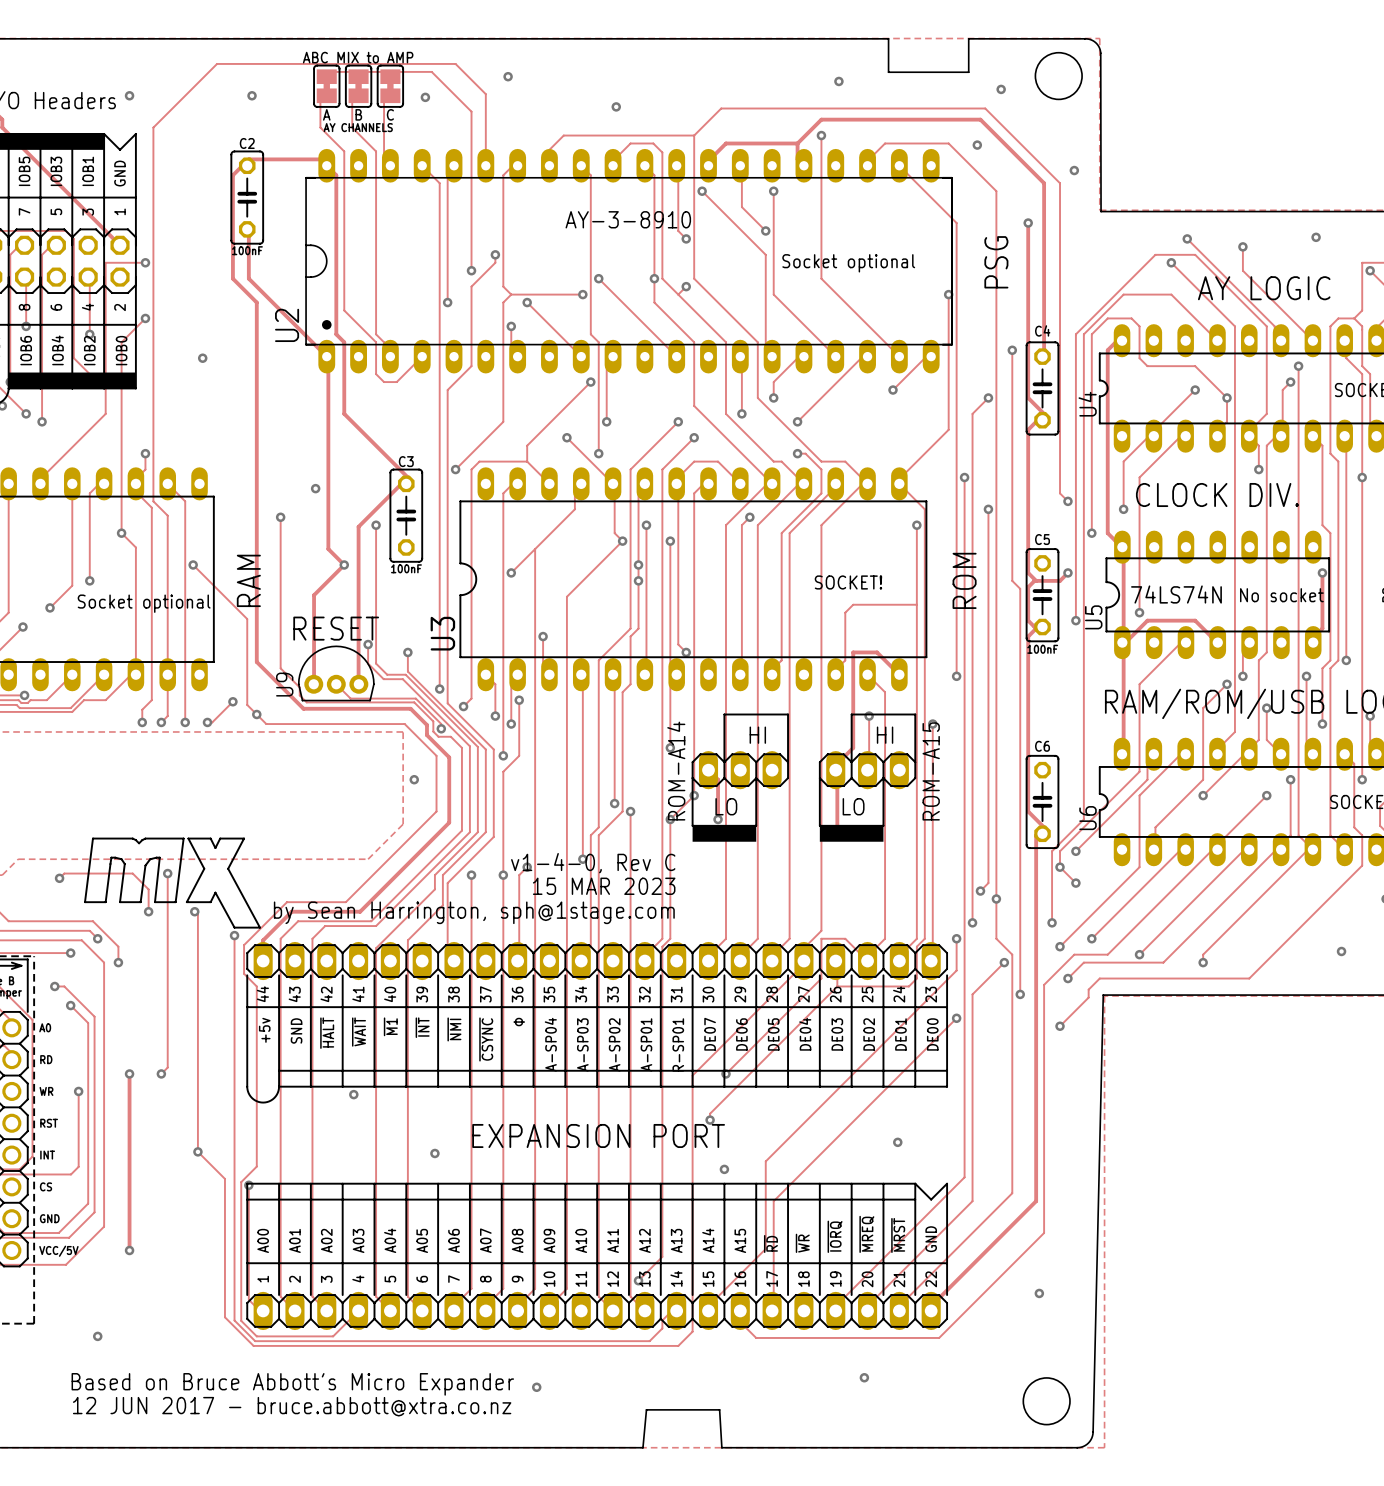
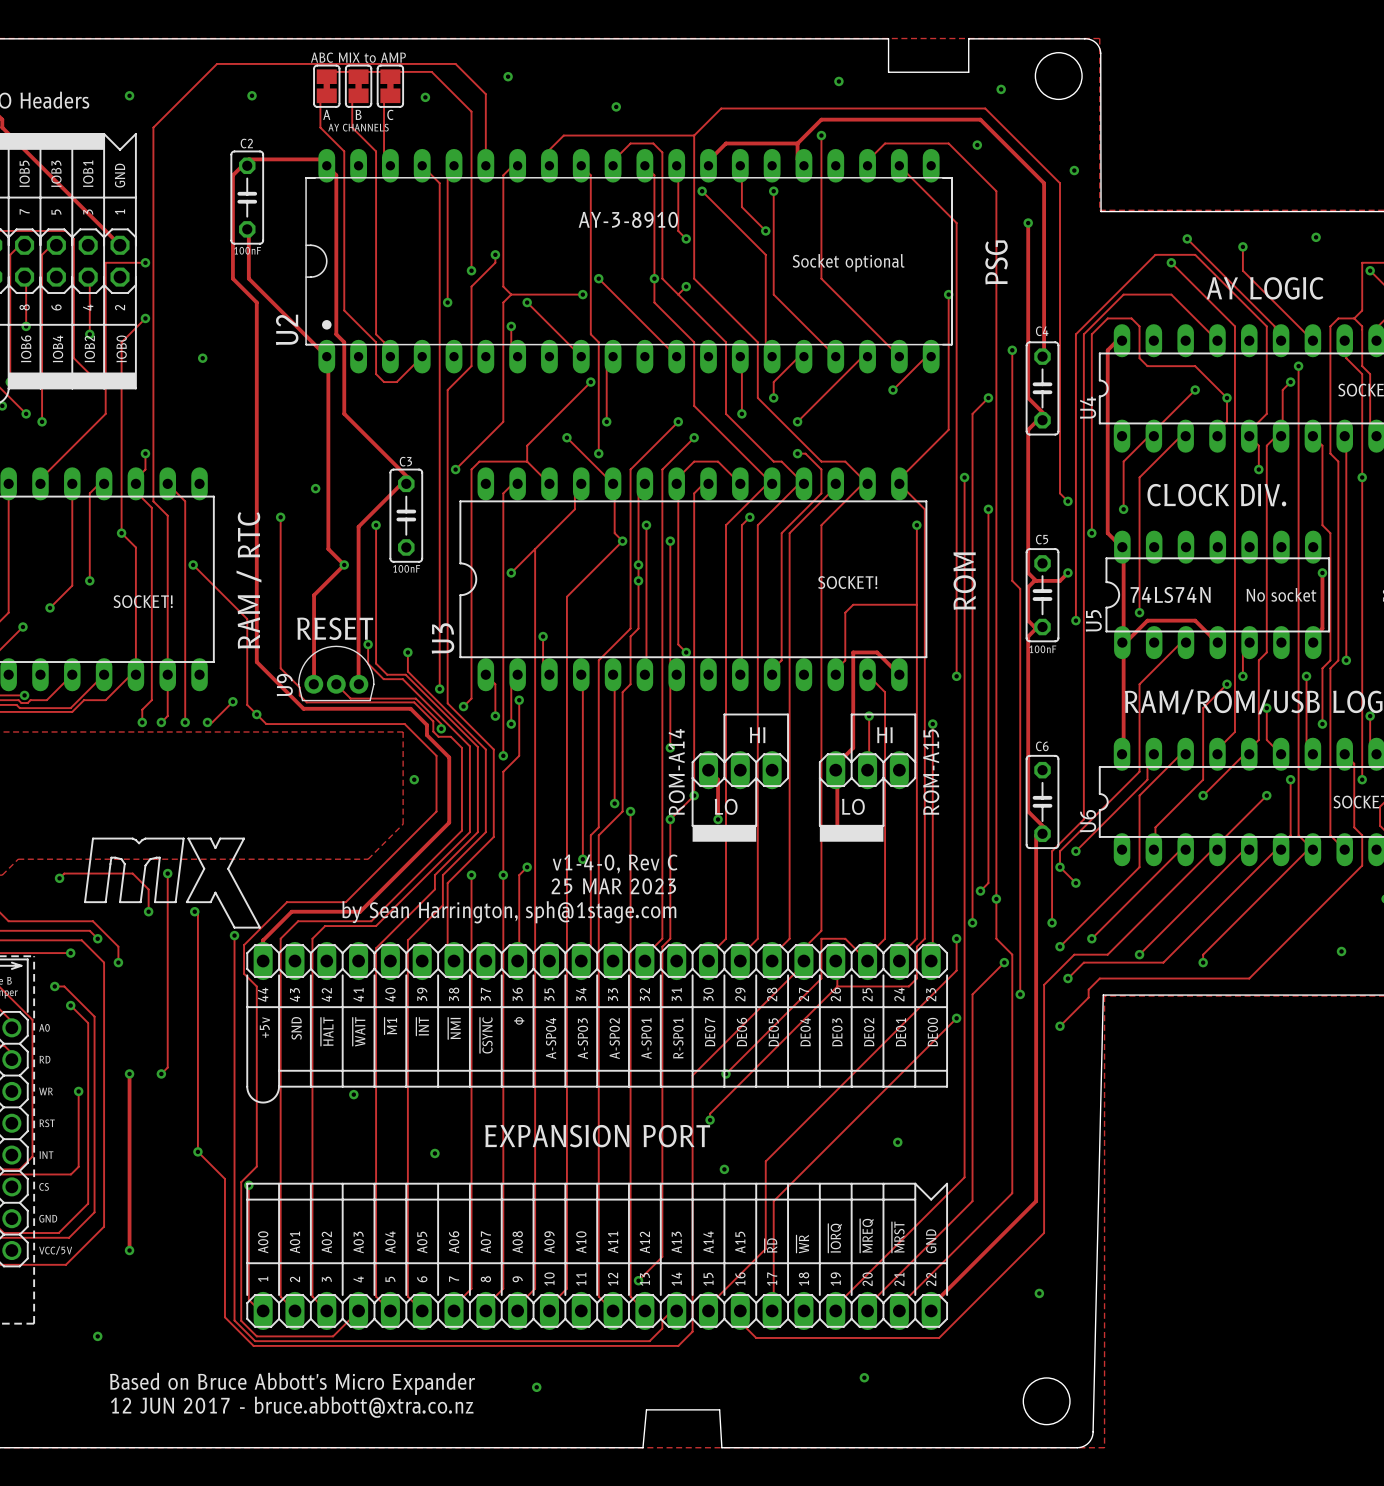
text: RAM (248, 580) -> RAM / RTC (248, 580)
text: Socket optional (144, 603) -> SOCKET! (143, 601)
text: 15 MAR 2023 (604, 886) -> 25 MAR 2023 (613, 886)

